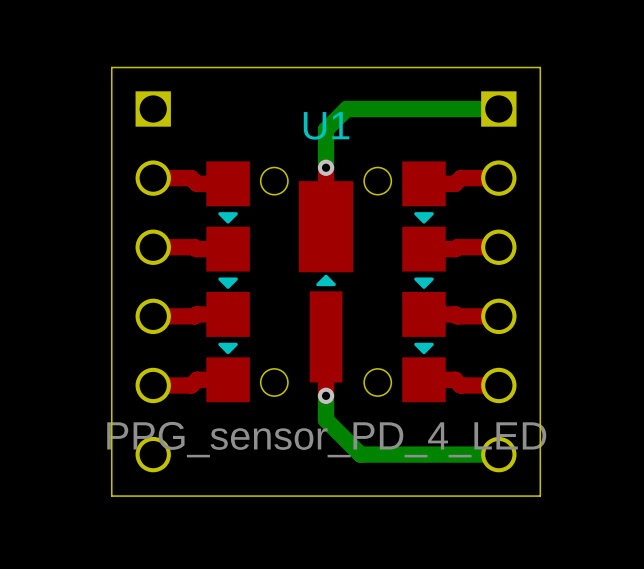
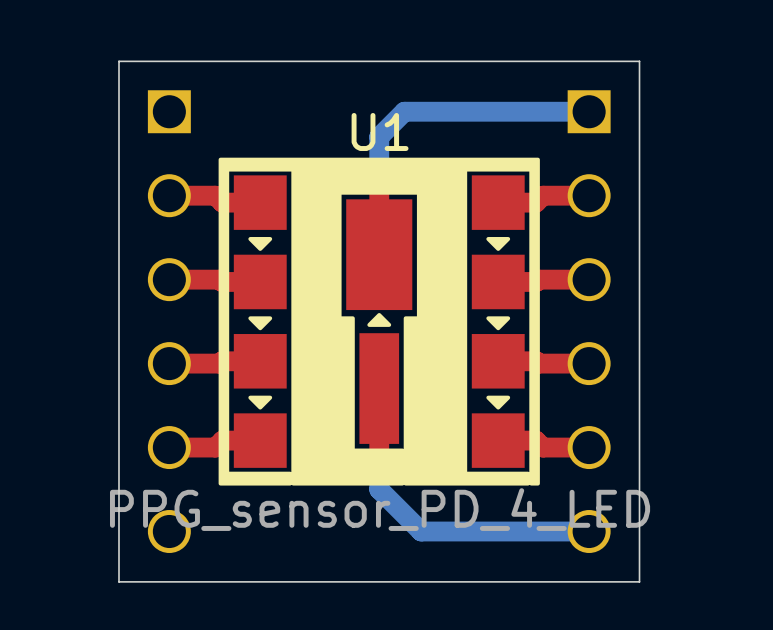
U1 footprint: [206, 161, 446, 403] -> [218, 157, 540, 486]

